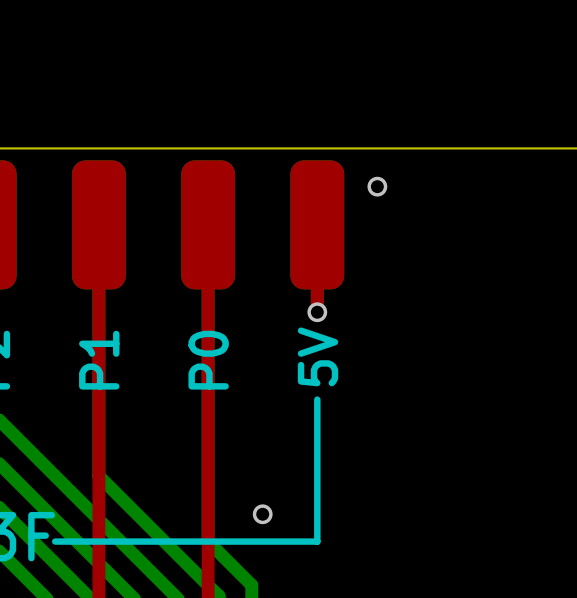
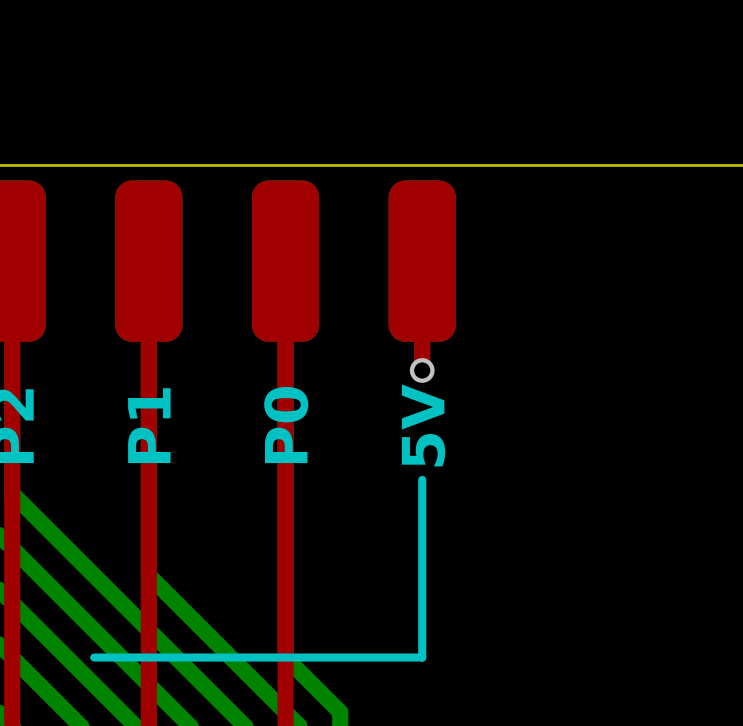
via: (377, 186) -> none
via: (262, 514) -> none

